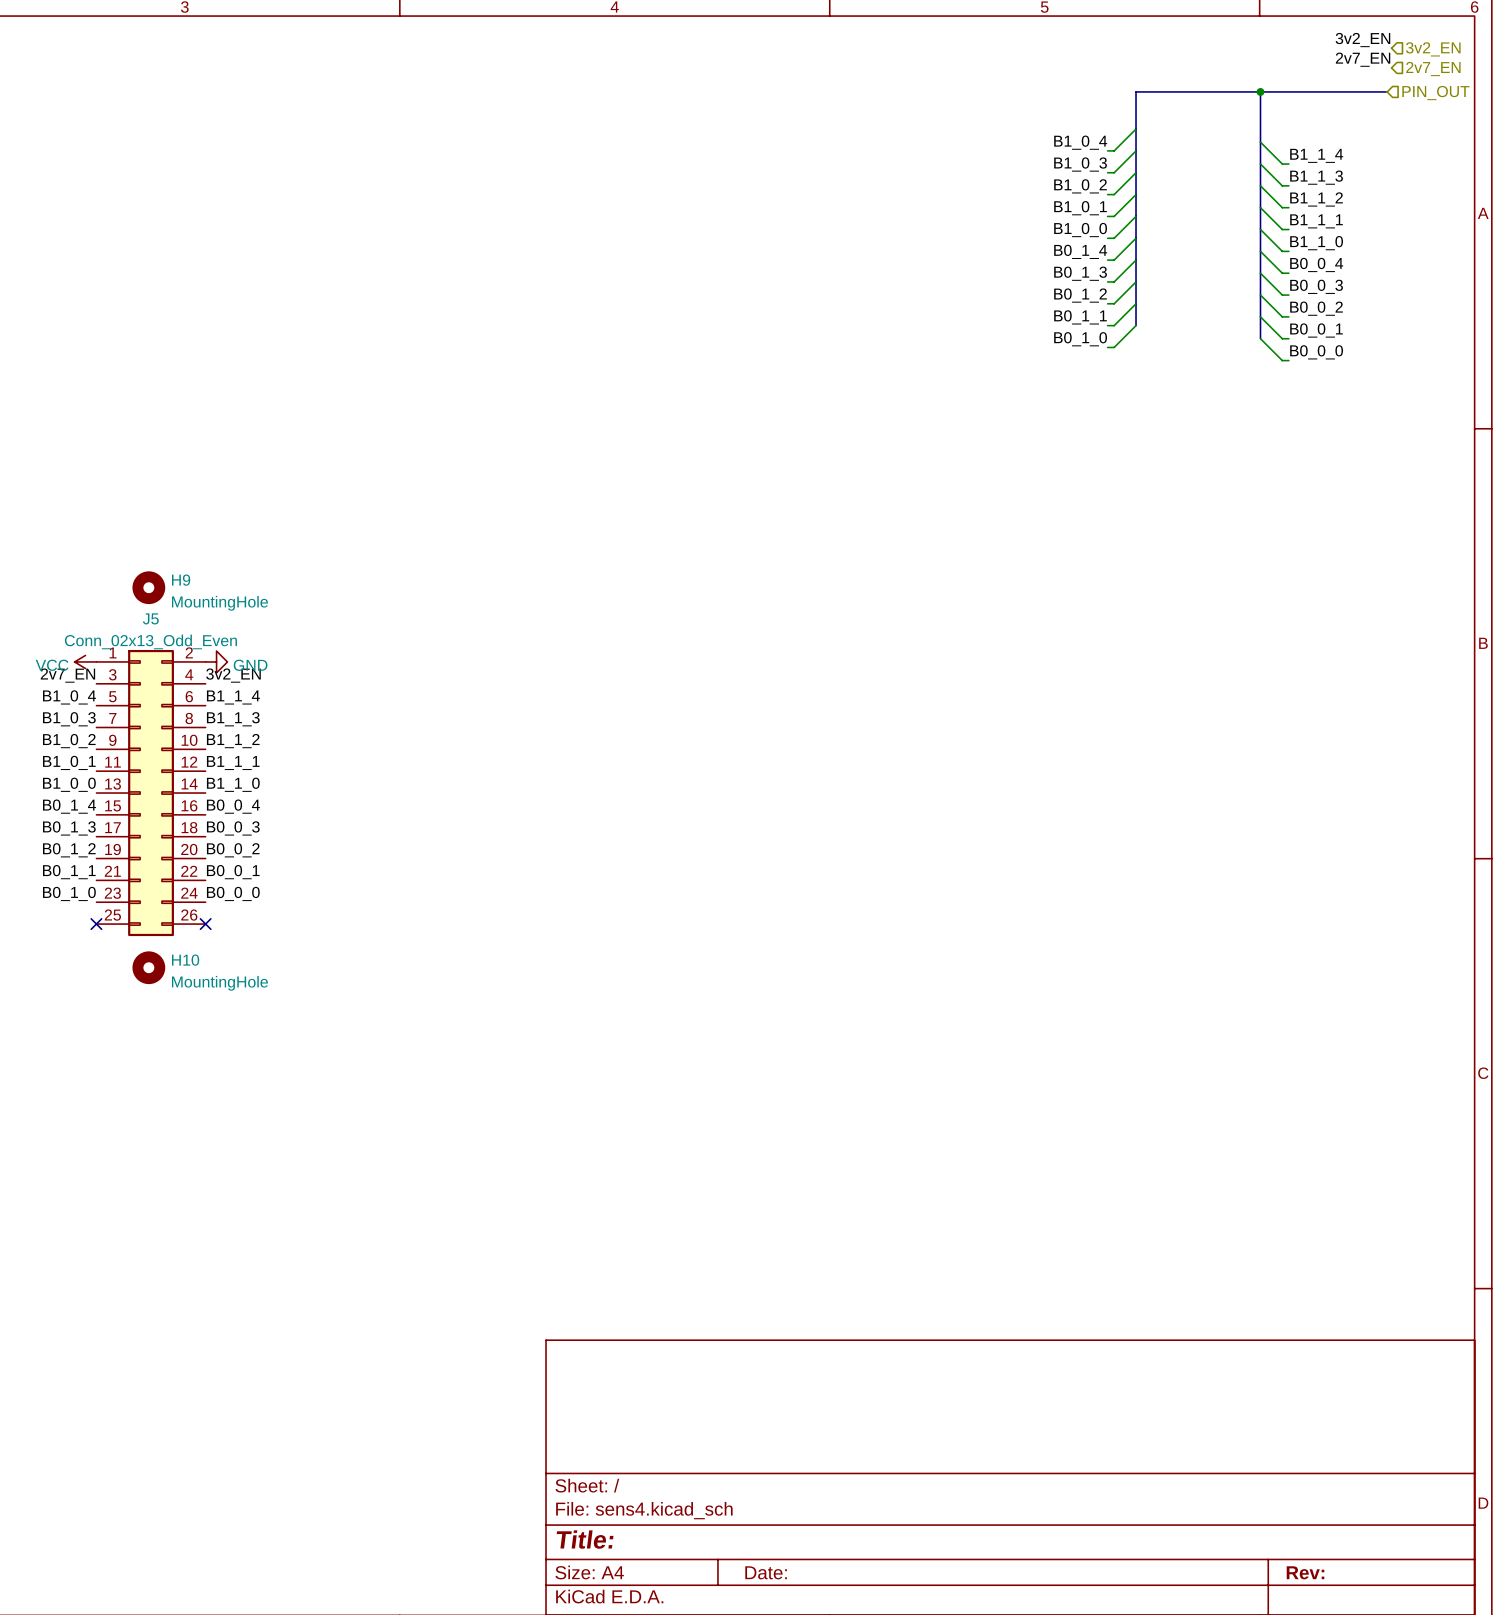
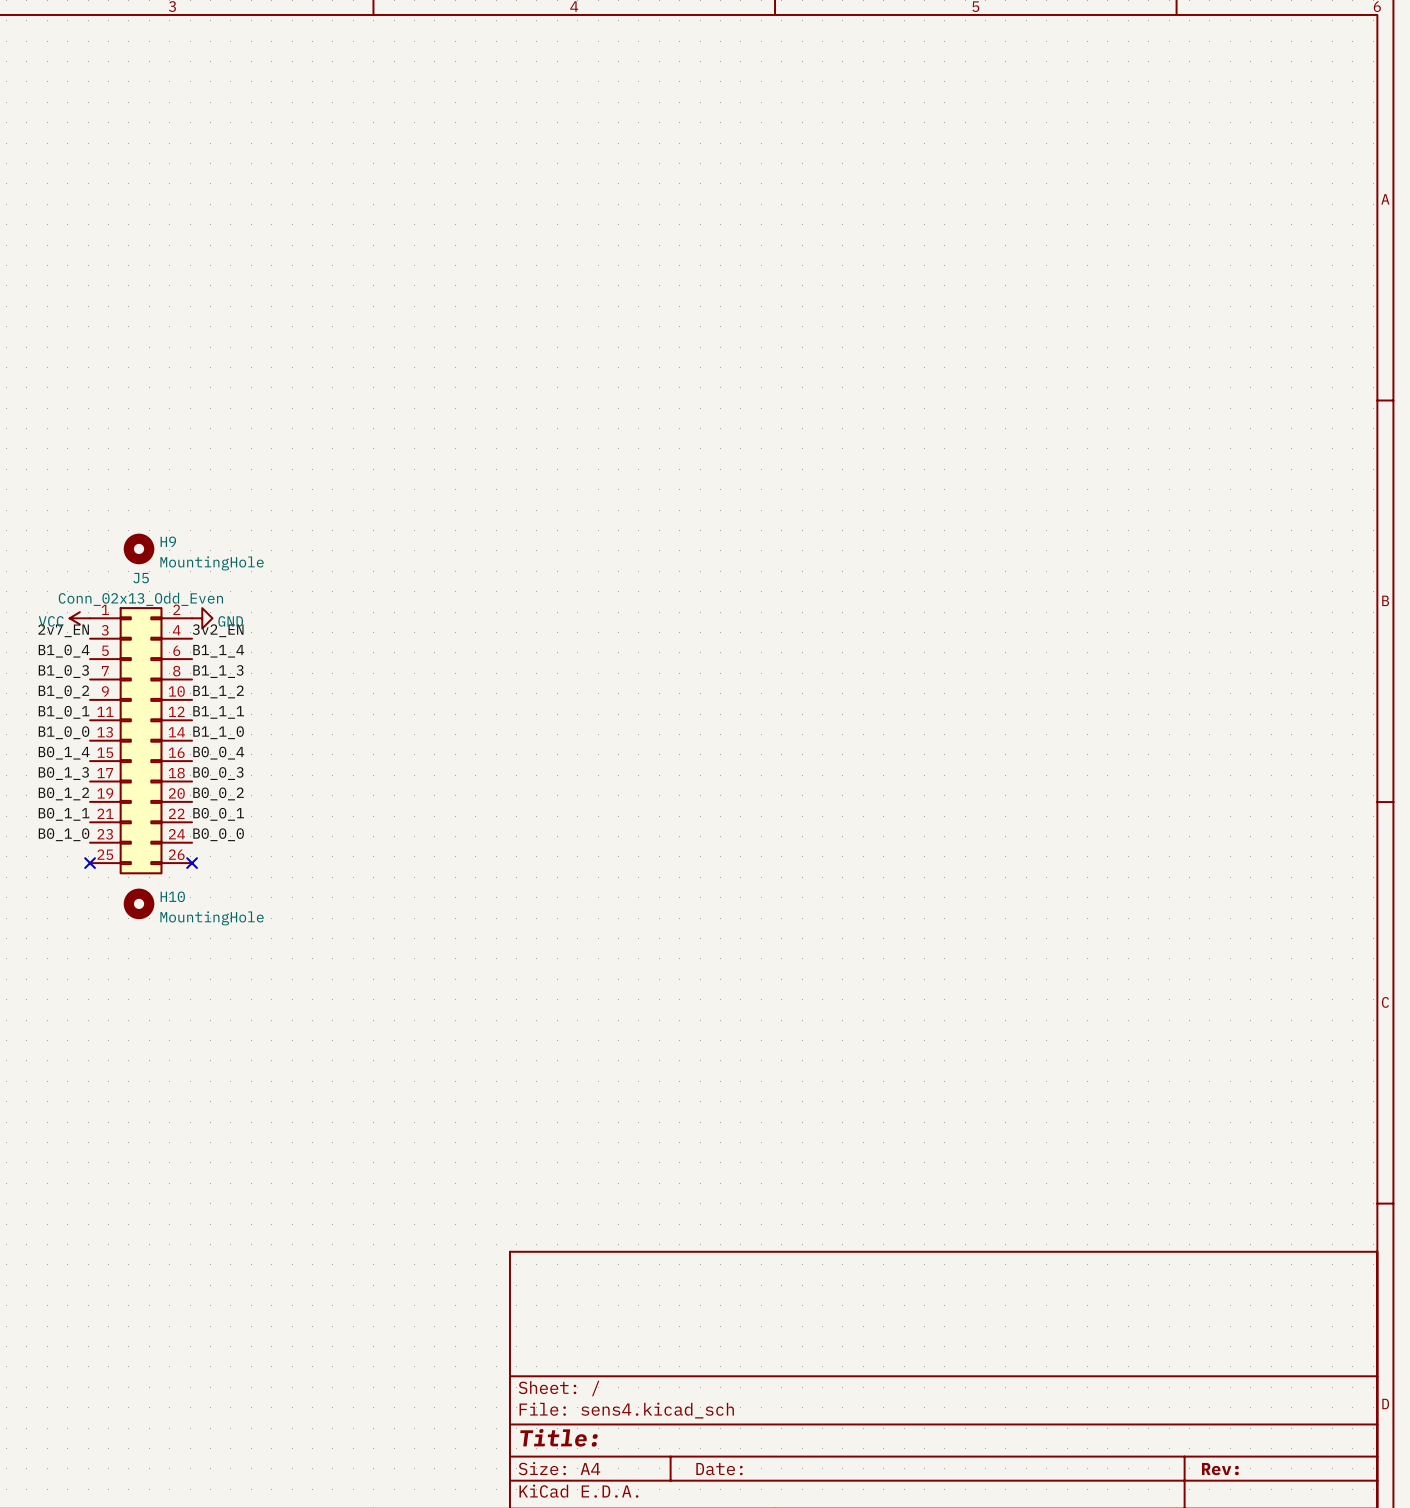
label: 3v2_EN (1362, 40) -> none
hierarchical label: 3v2_EN (1433, 49) -> none
label: 2v7_EN (1363, 59) -> none
hierarchical label: 2v7_EN (1433, 69) -> none
bus: (1260, 91) (1260, 338) -> none
junction: (1260, 91) -> none
bus: (1387, 91) (1136, 91) (1136, 325) -> none
hierarchical label: PIN_OUT (1435, 93) -> none
wire: (1136, 129) (1114, 150) (1107, 150) -> none
label: B1_0_4 (1080, 142) -> none
wire: (1260, 142) (1282, 164) (1288, 164) -> none
wire: (1136, 150) (1114, 172) (1107, 172) -> none
label: B1_1_4 (1316, 155) -> none
label: B1_0_3 (1080, 164) -> none
wire: (1260, 164) (1282, 185) (1288, 185) -> none
wire: (1136, 172) (1114, 194) (1107, 194) -> none
label: B1_1_3 (1316, 177) -> none
wire: (1260, 185) (1282, 207) (1288, 207) -> none
label: B1_0_2 (1080, 186) -> none
wire: (1136, 194) (1114, 216) (1107, 216) -> none
label: B1_1_2 (1316, 199) -> none
wire: (1260, 207) (1282, 229) (1288, 229) -> none
label: B1_0_1 (1080, 208) -> none
wire: (1136, 216) (1114, 238) (1107, 238) -> none
label: B1_1_1 (1316, 221) -> none
wire: (1260, 229) (1282, 251) (1288, 251) -> none
label: B1_0_0 (1080, 230) -> none
wire: (1136, 238) (1114, 260) (1107, 260) -> none
label: B1_1_0 (1316, 243) -> none
label: B0_1_4 (1080, 251) -> none
wire: (1260, 251) (1282, 273) (1288, 273) -> none
wire: (1136, 260) (1114, 281) (1107, 281) -> none
label: B0_0_4 (1316, 264) -> none
label: B0_1_3 (1080, 273) -> none
wire: (1260, 273) (1282, 295) (1288, 295) -> none
wire: (1136, 281) (1114, 303) (1107, 303) -> none
label: B0_0_3 (1316, 286) -> none
label: B0_1_2 (1080, 295) -> none
wire: (1260, 295) (1282, 316) (1288, 316) -> none
wire: (1136, 303) (1114, 325) (1107, 325) -> none
label: B0_0_2 (1316, 308) -> none
wire: (1260, 316) (1282, 338) (1288, 338) -> none
label: B0_1_1 (1080, 317) -> none
wire: (1136, 325) (1114, 347) (1107, 347) -> none
label: B0_0_1 (1316, 330) -> none
wire: (1260, 338) (1282, 360) (1288, 360) -> none
label: B0_1_0 (1080, 339) -> none
label: B0_0_0 (1316, 352) -> none

